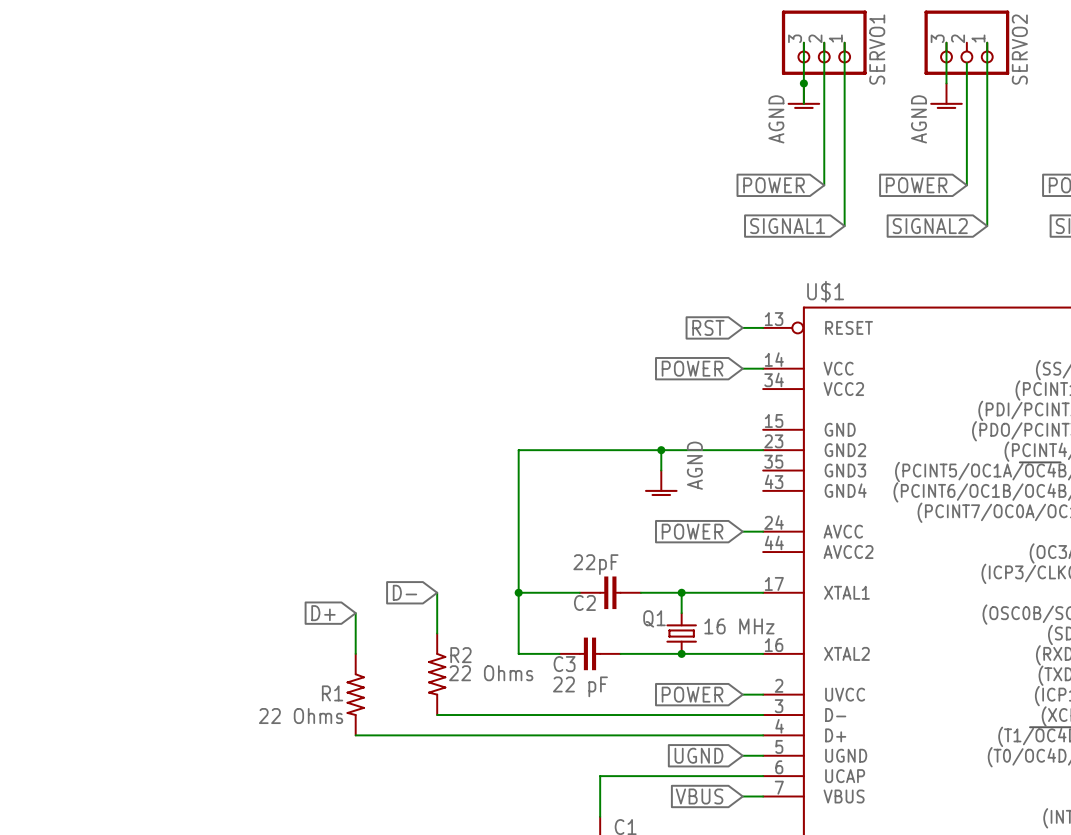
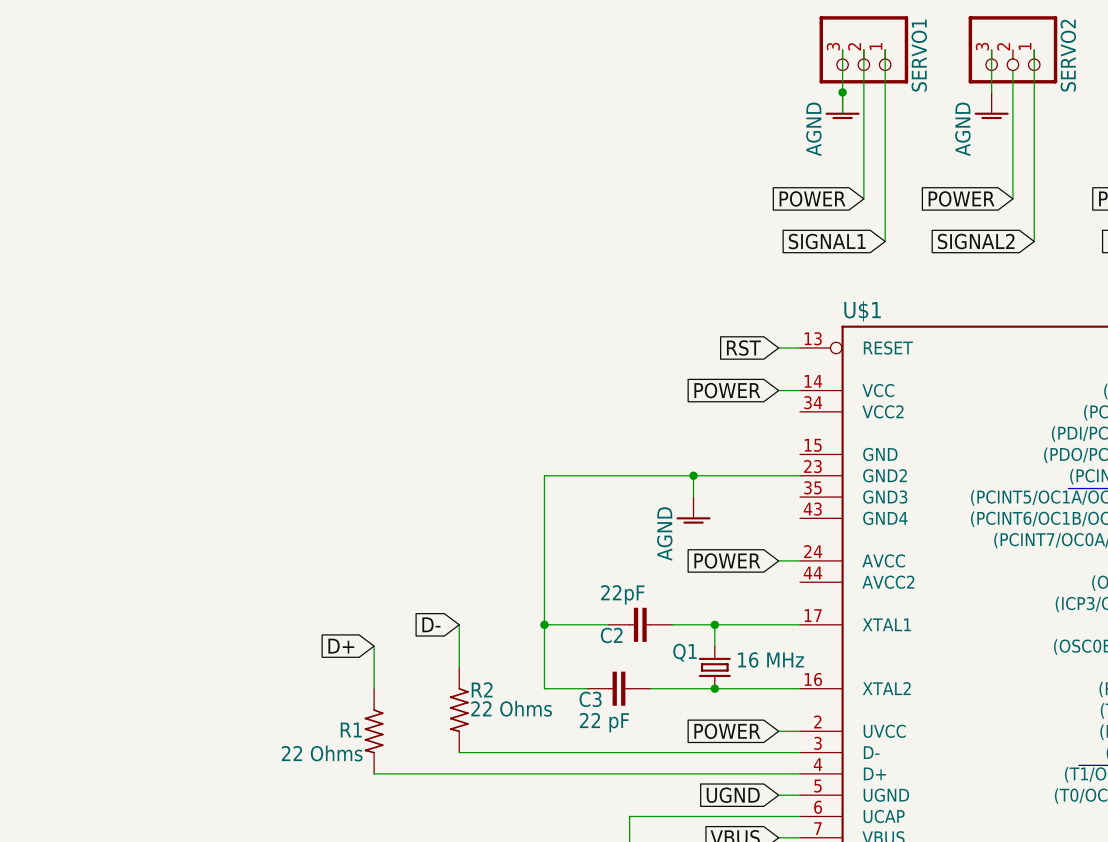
power symbol text position: AGND (694, 465) -> AGND (664, 534)

